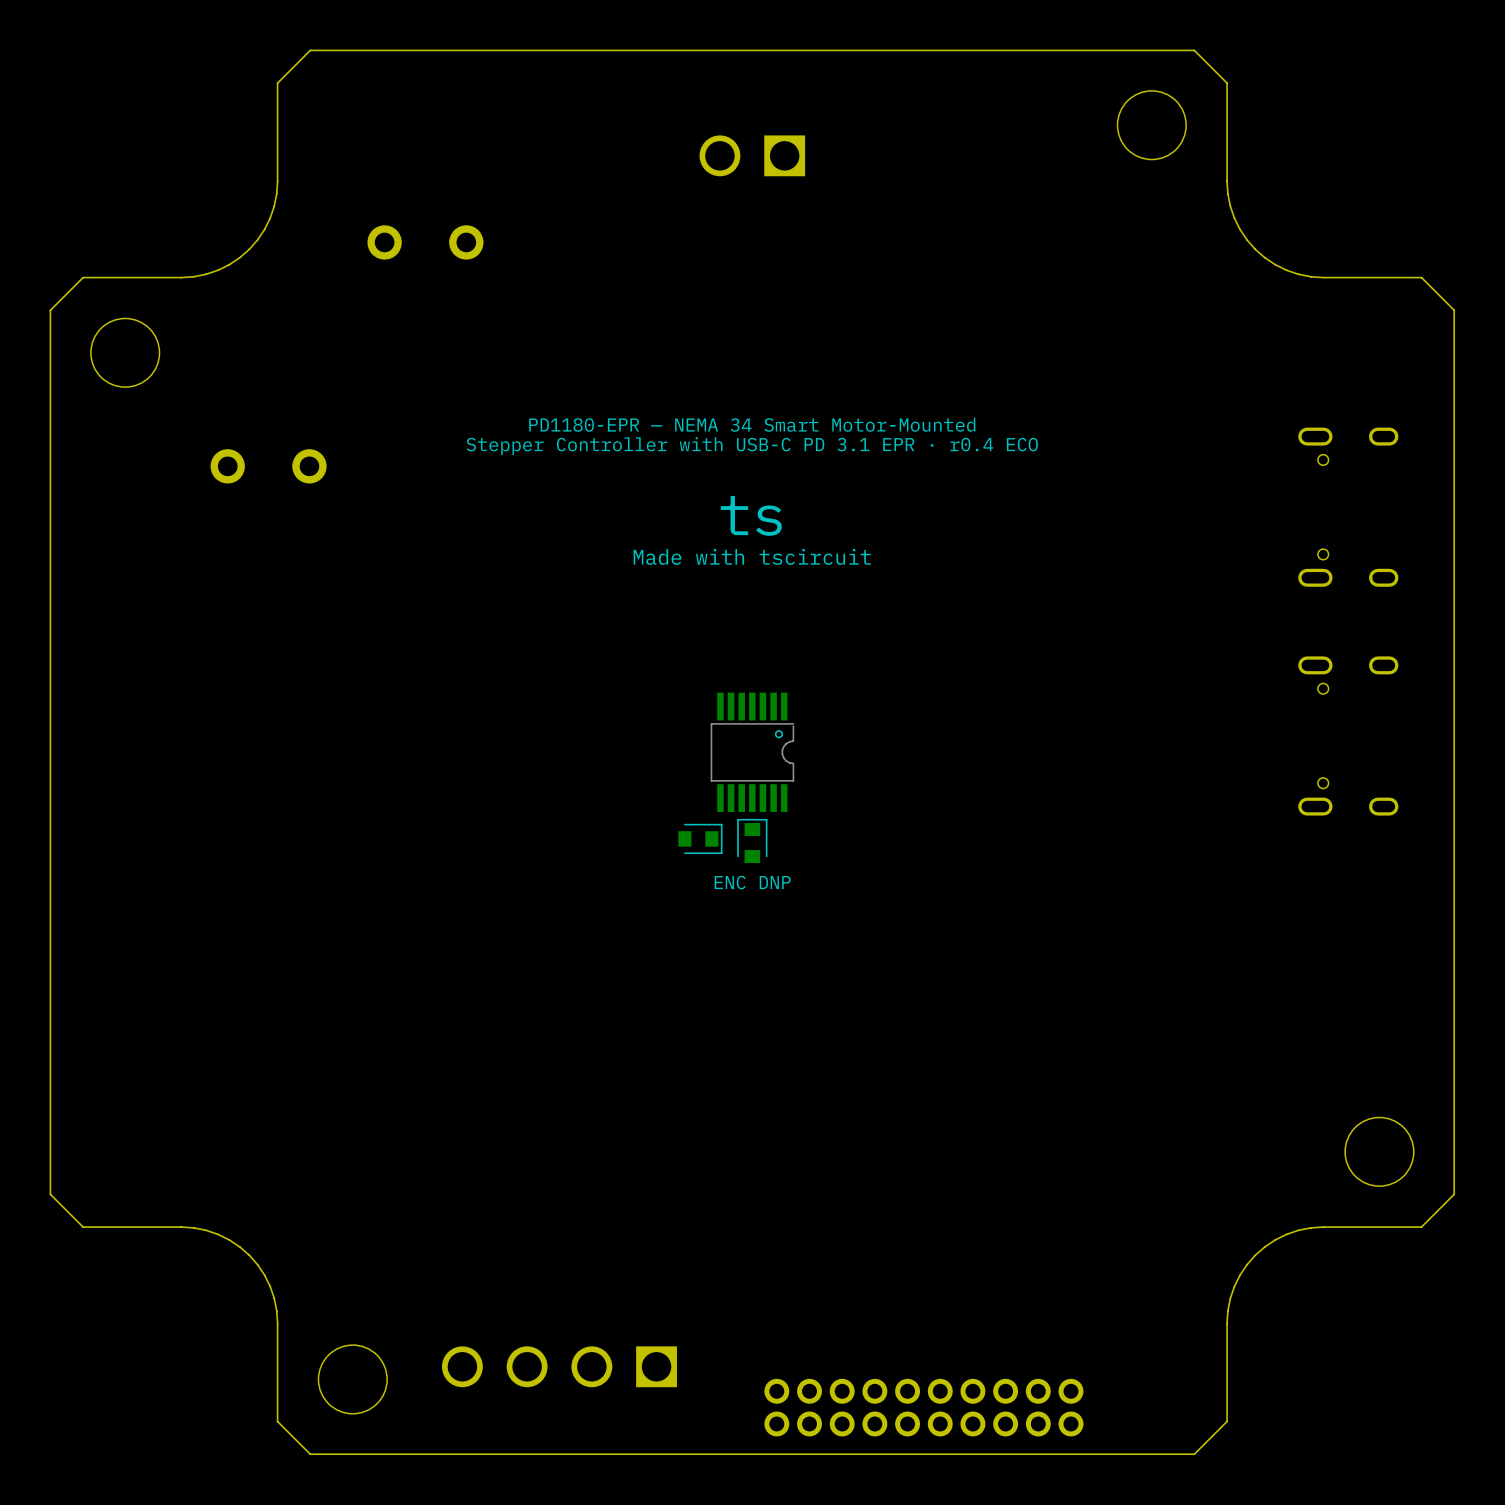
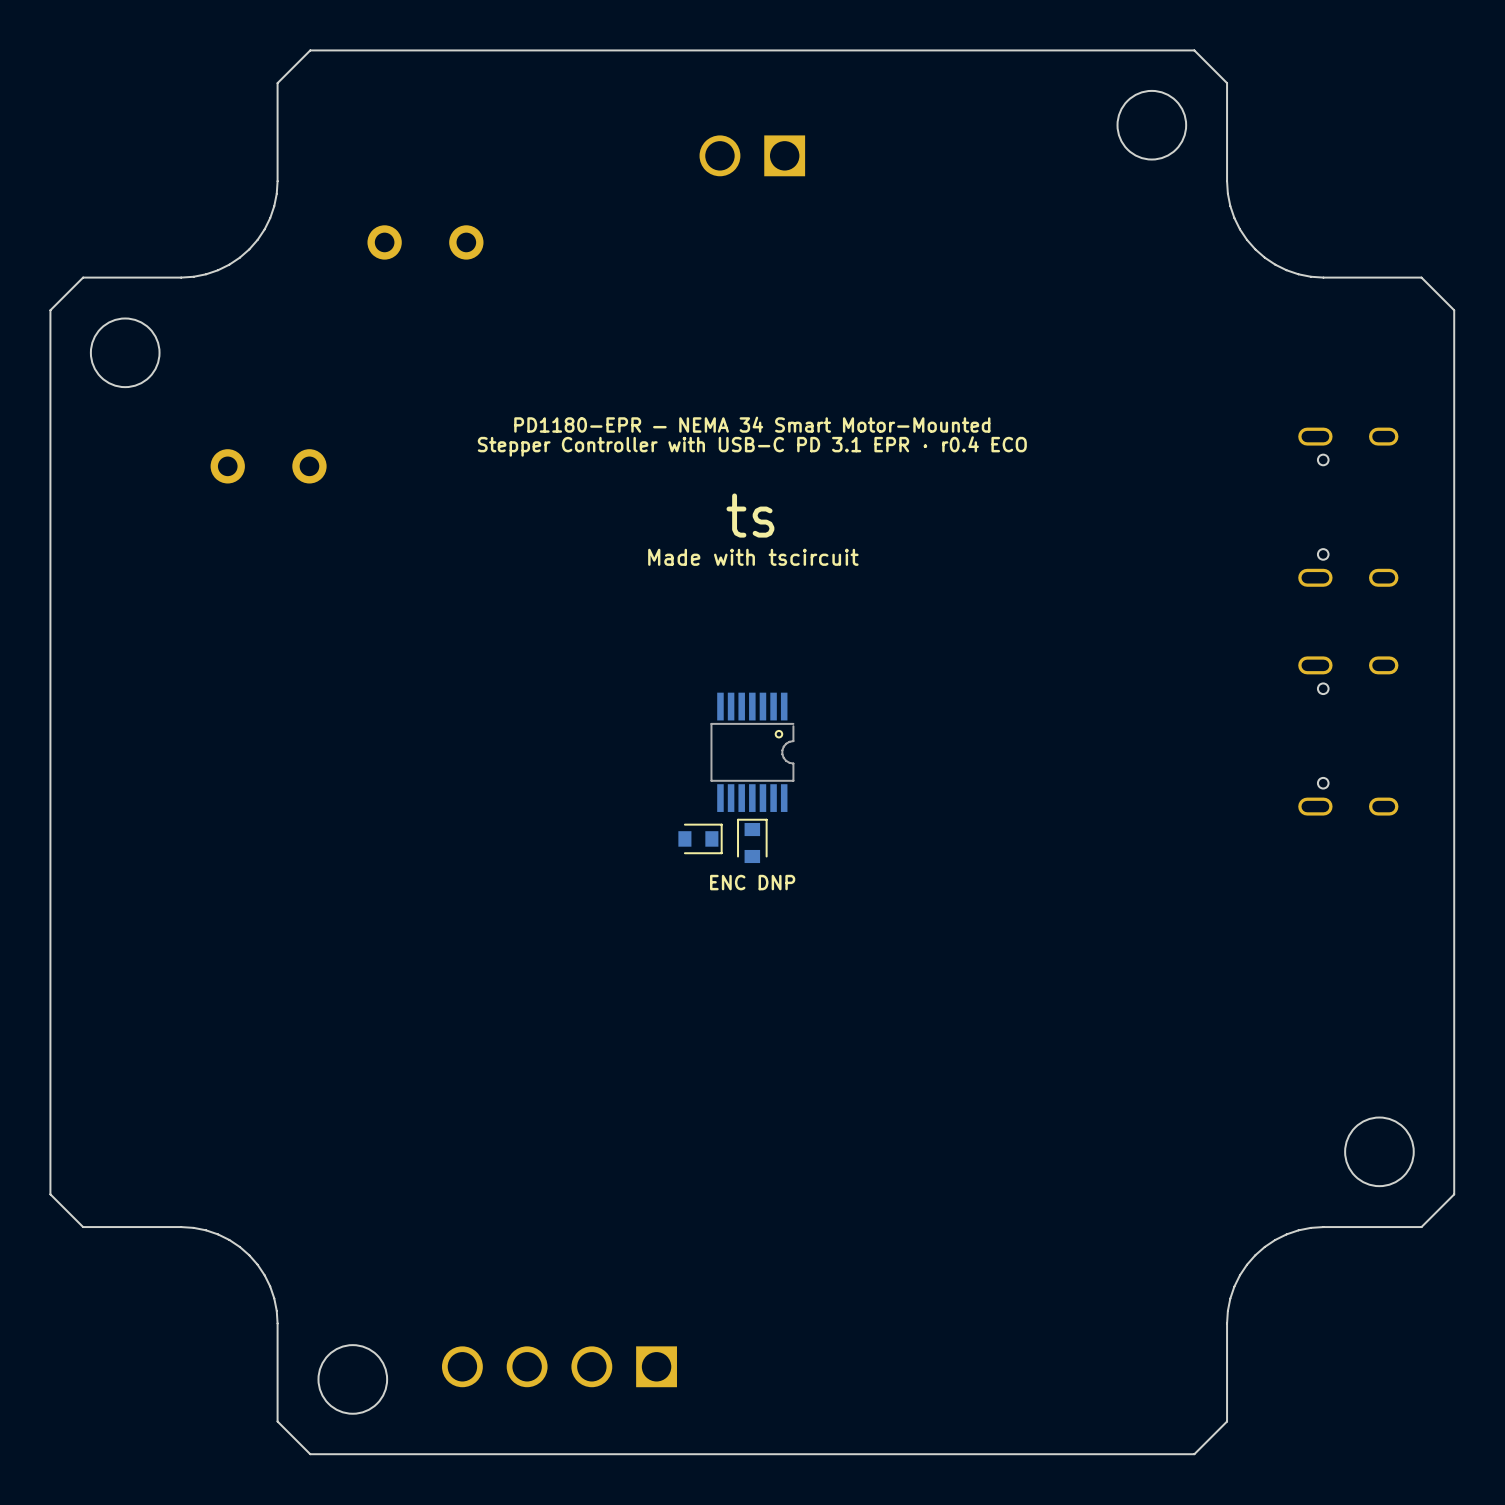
part: (923, 1407) -> none

